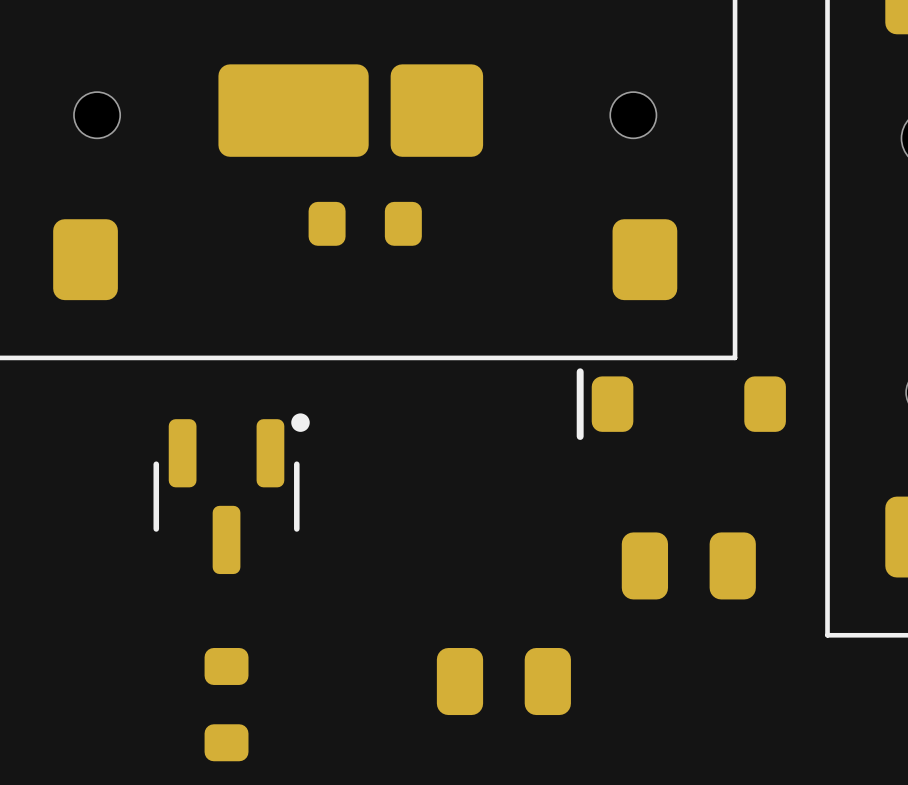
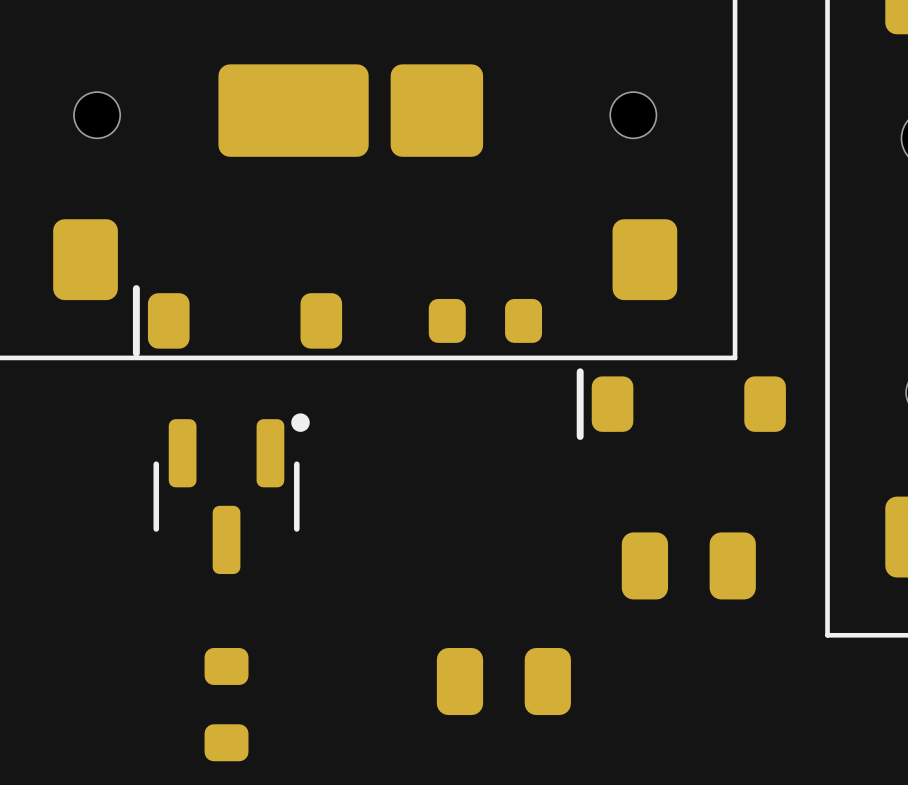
part position: (365, 223) -> (485, 320)
part: none -> (237, 320)

